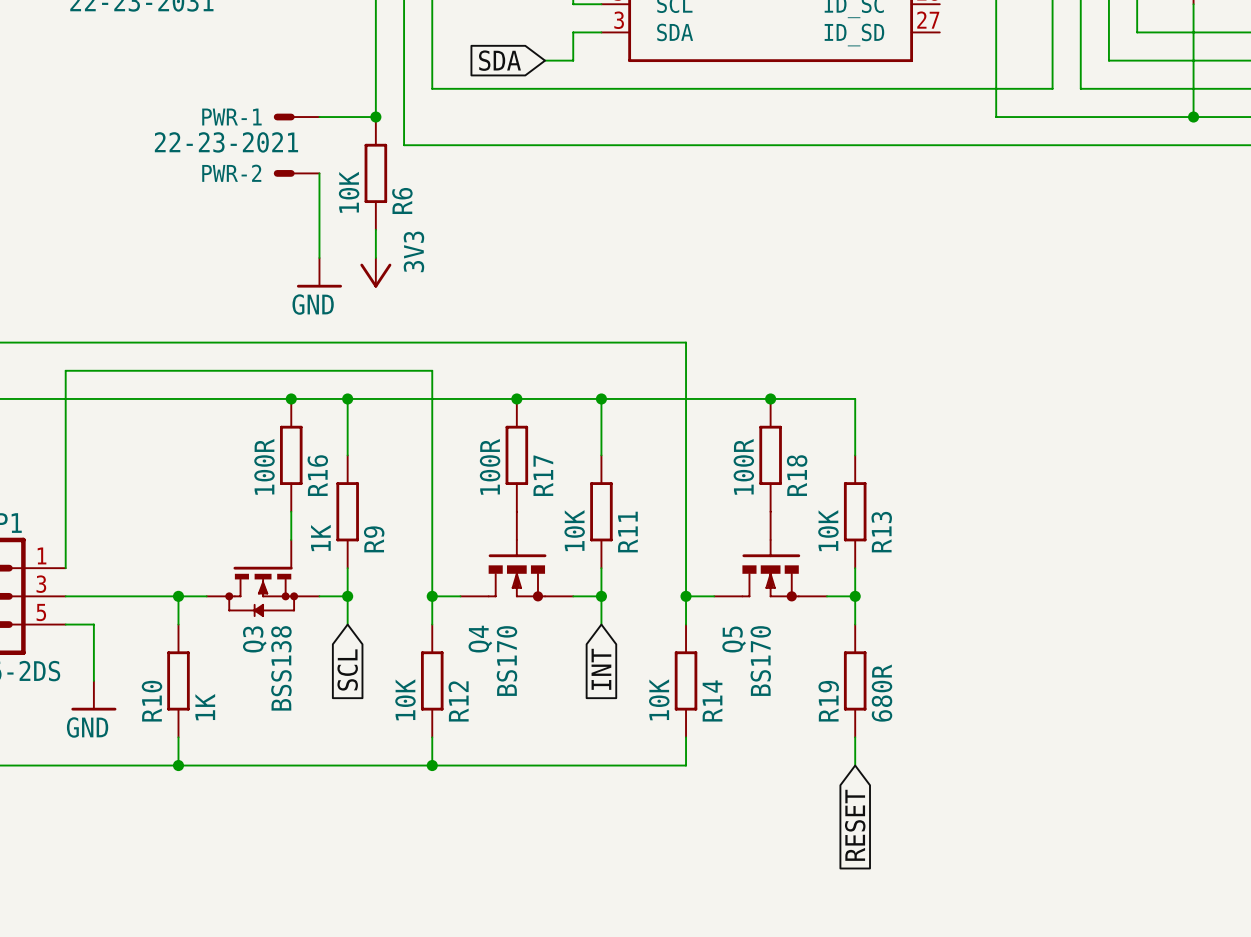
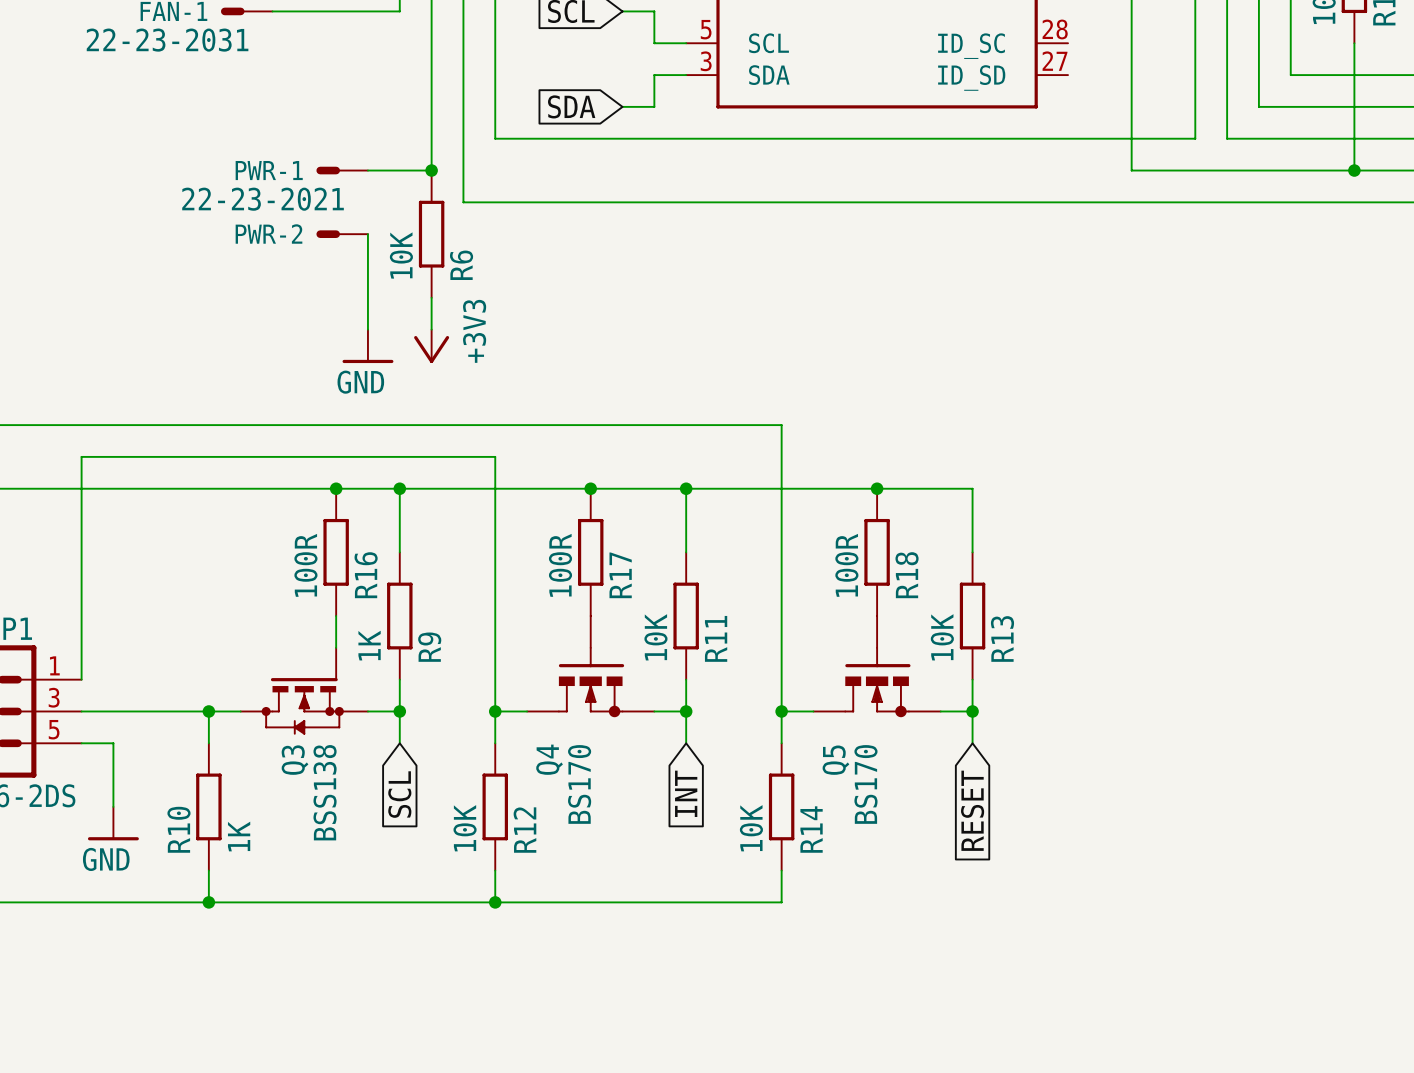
power symbol: 3V3 (375, 272) -> +3V3 (431, 346)
R19: 680R (855, 680) -> none
wire: (855, 737) (855, 765) -> none
global label position: RESET (855, 825) -> RESET (972, 810)

